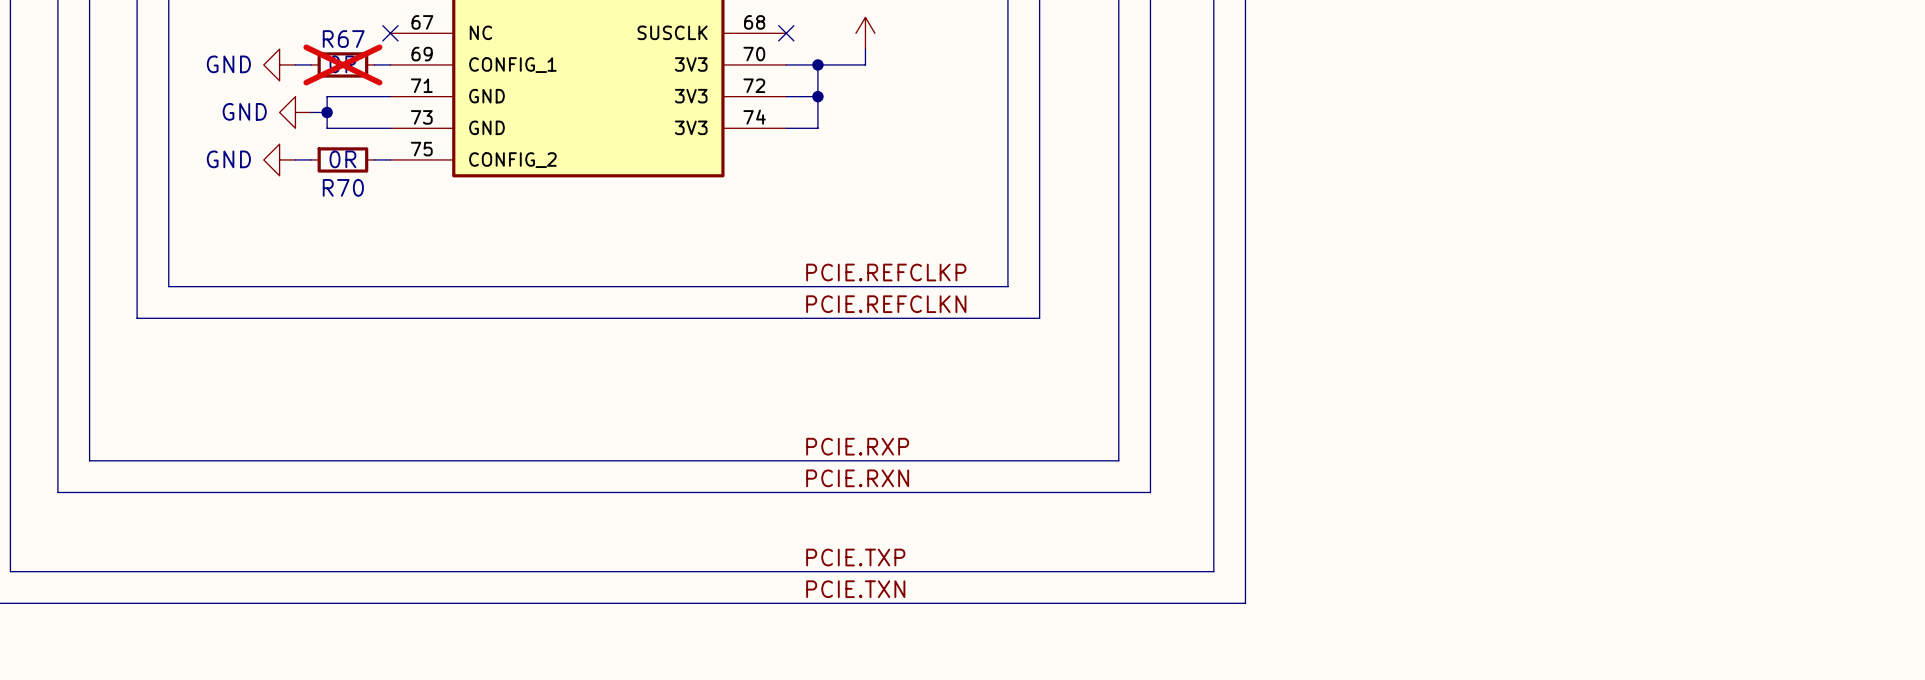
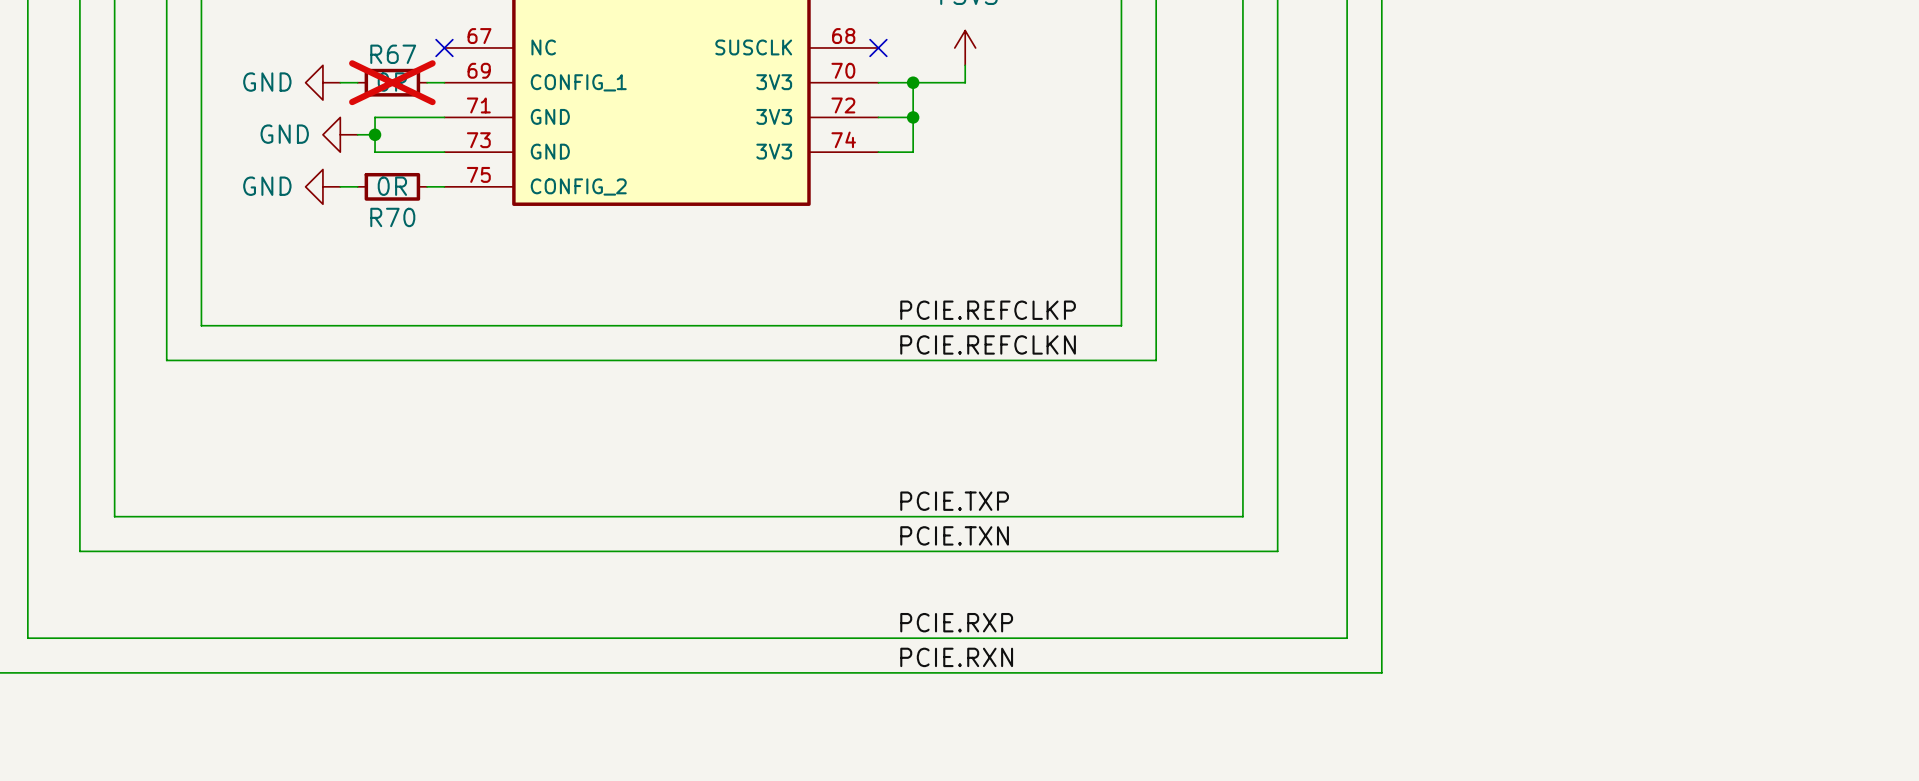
label: PCIE.RXP (857, 446) -> PCIE.TXP (954, 501)
label: PCIE.RXN (857, 478) -> PCIE.TXN (954, 535)
label: PCIE.TXP (855, 557) -> PCIE.RXP (956, 622)
label: PCIE.TXN (855, 589) -> PCIE.RXN (956, 657)

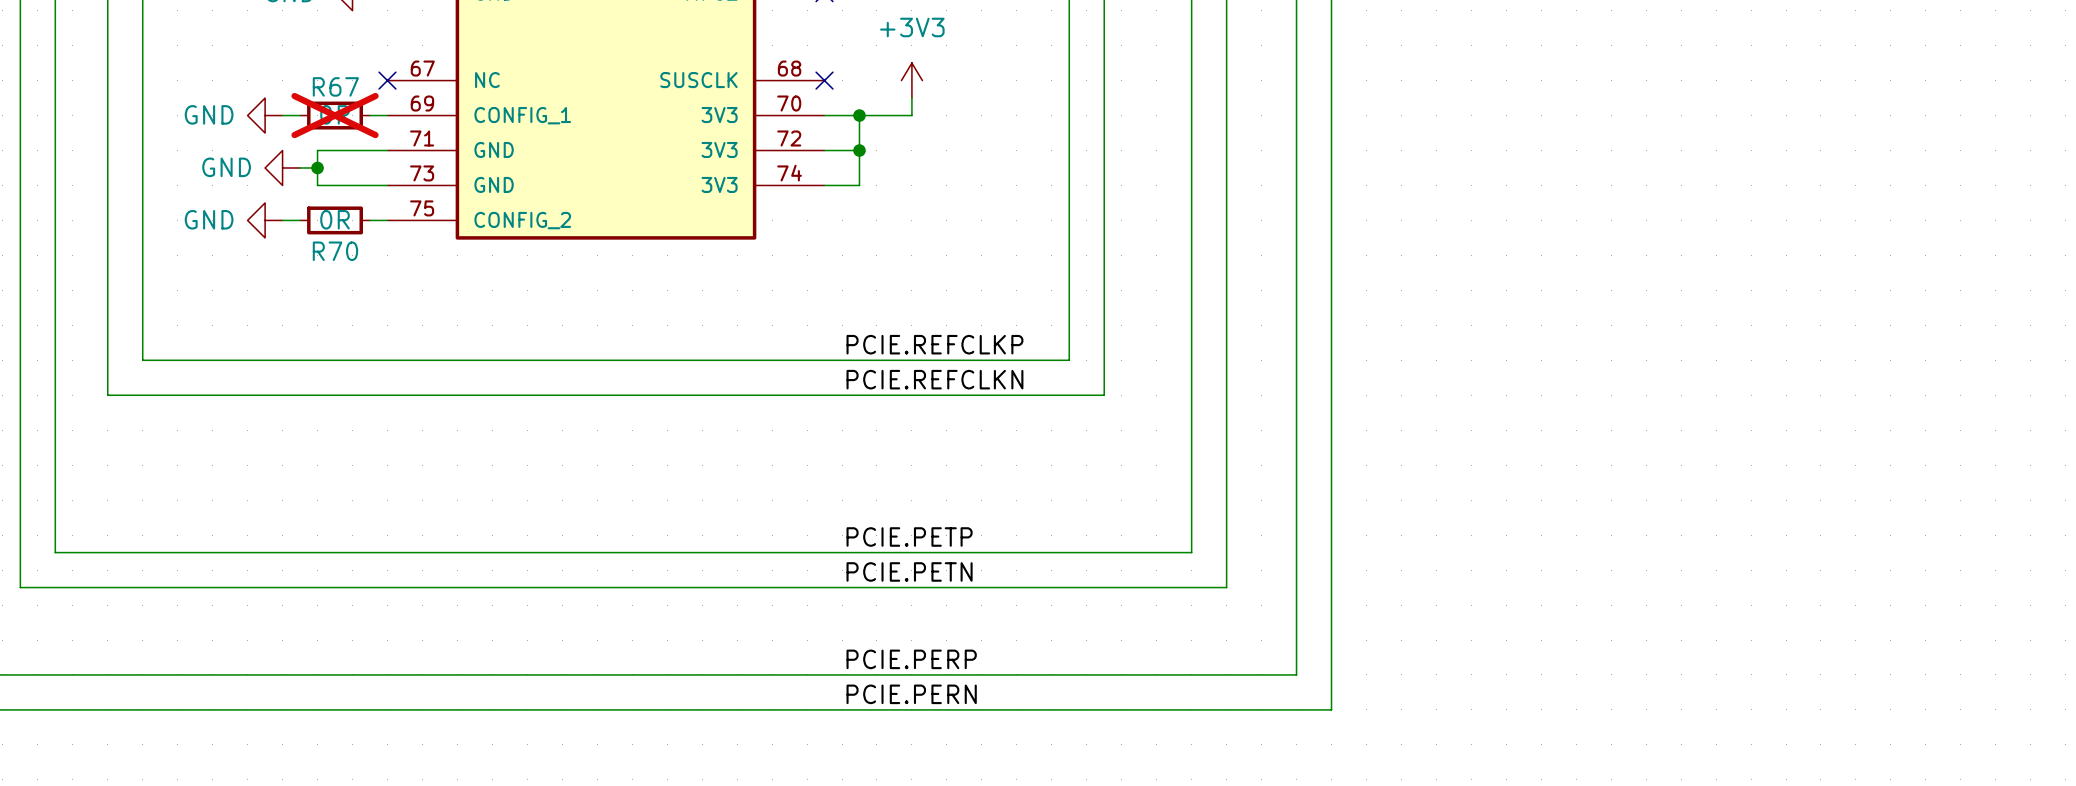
label: PCIE.TXP (954, 501) -> PCIE.PETP (909, 536)
label: PCIE.TXN (954, 535) -> PCIE.PETN (909, 571)
label: PCIE.RXP (956, 622) -> PCIE.PERP (911, 659)
label: PCIE.RXN (956, 657) -> PCIE.PERN (911, 694)

